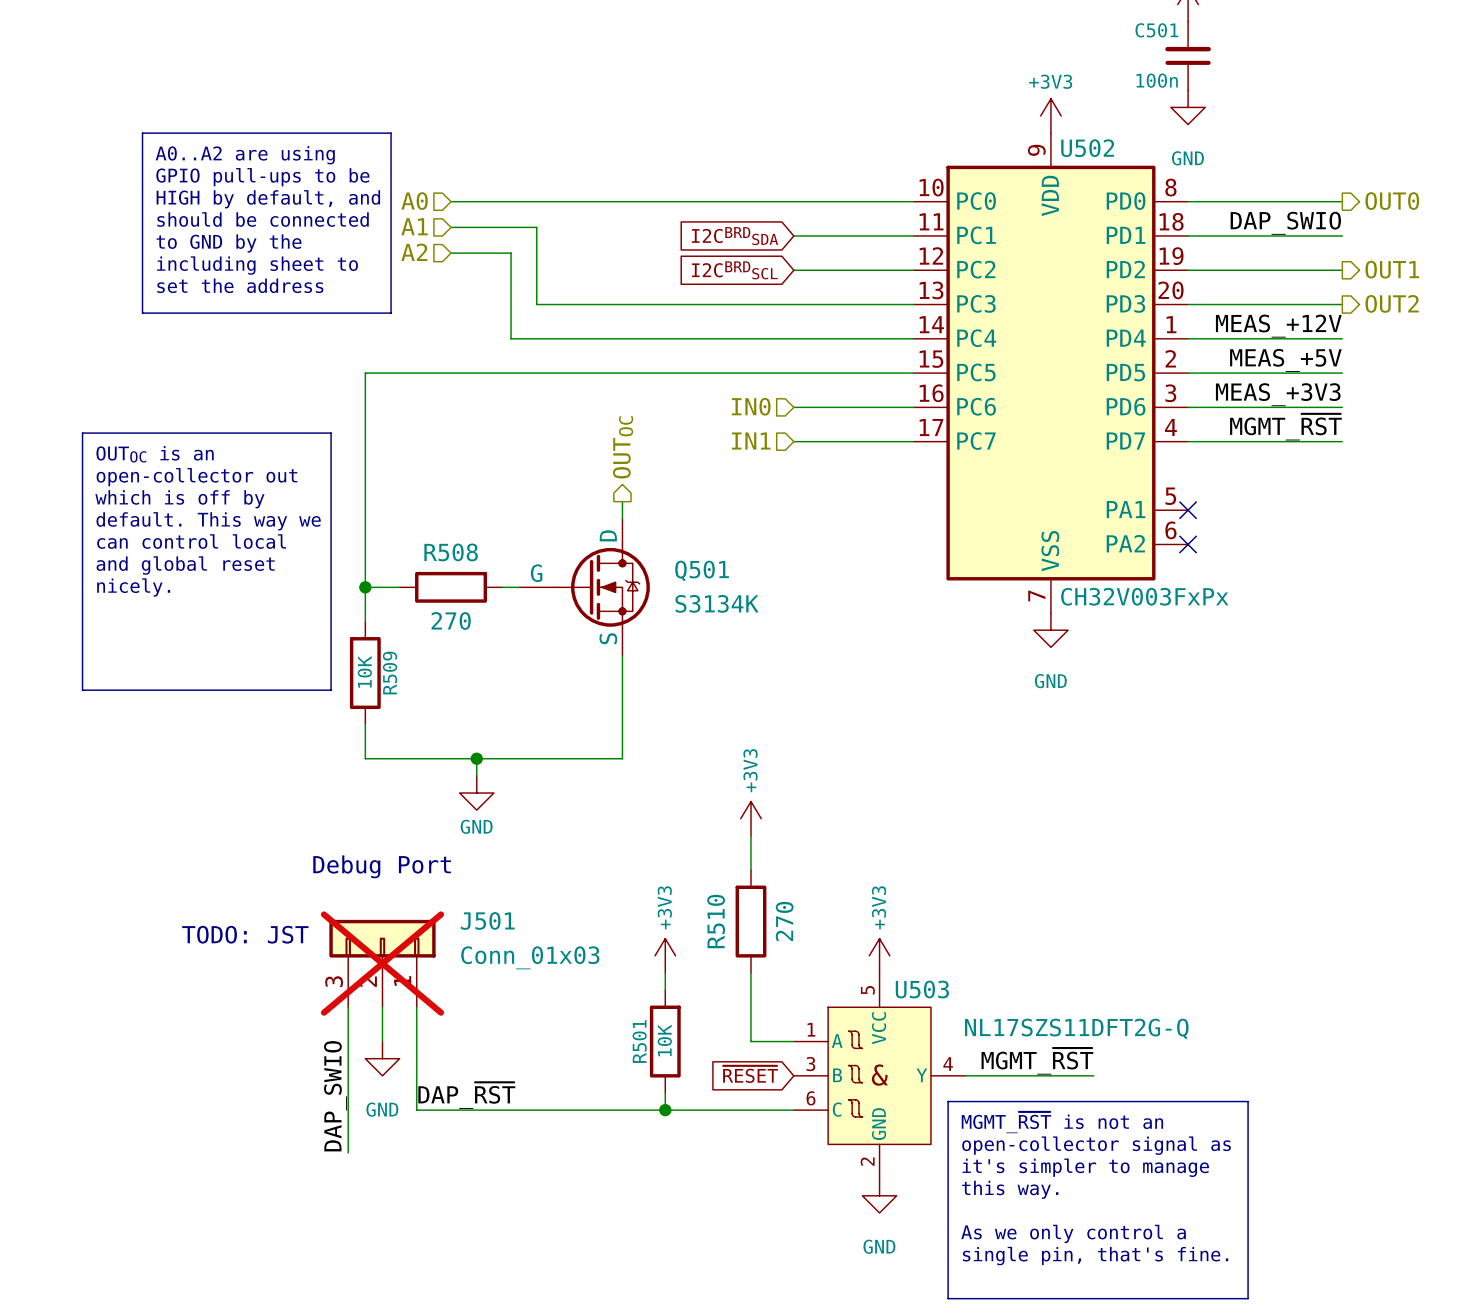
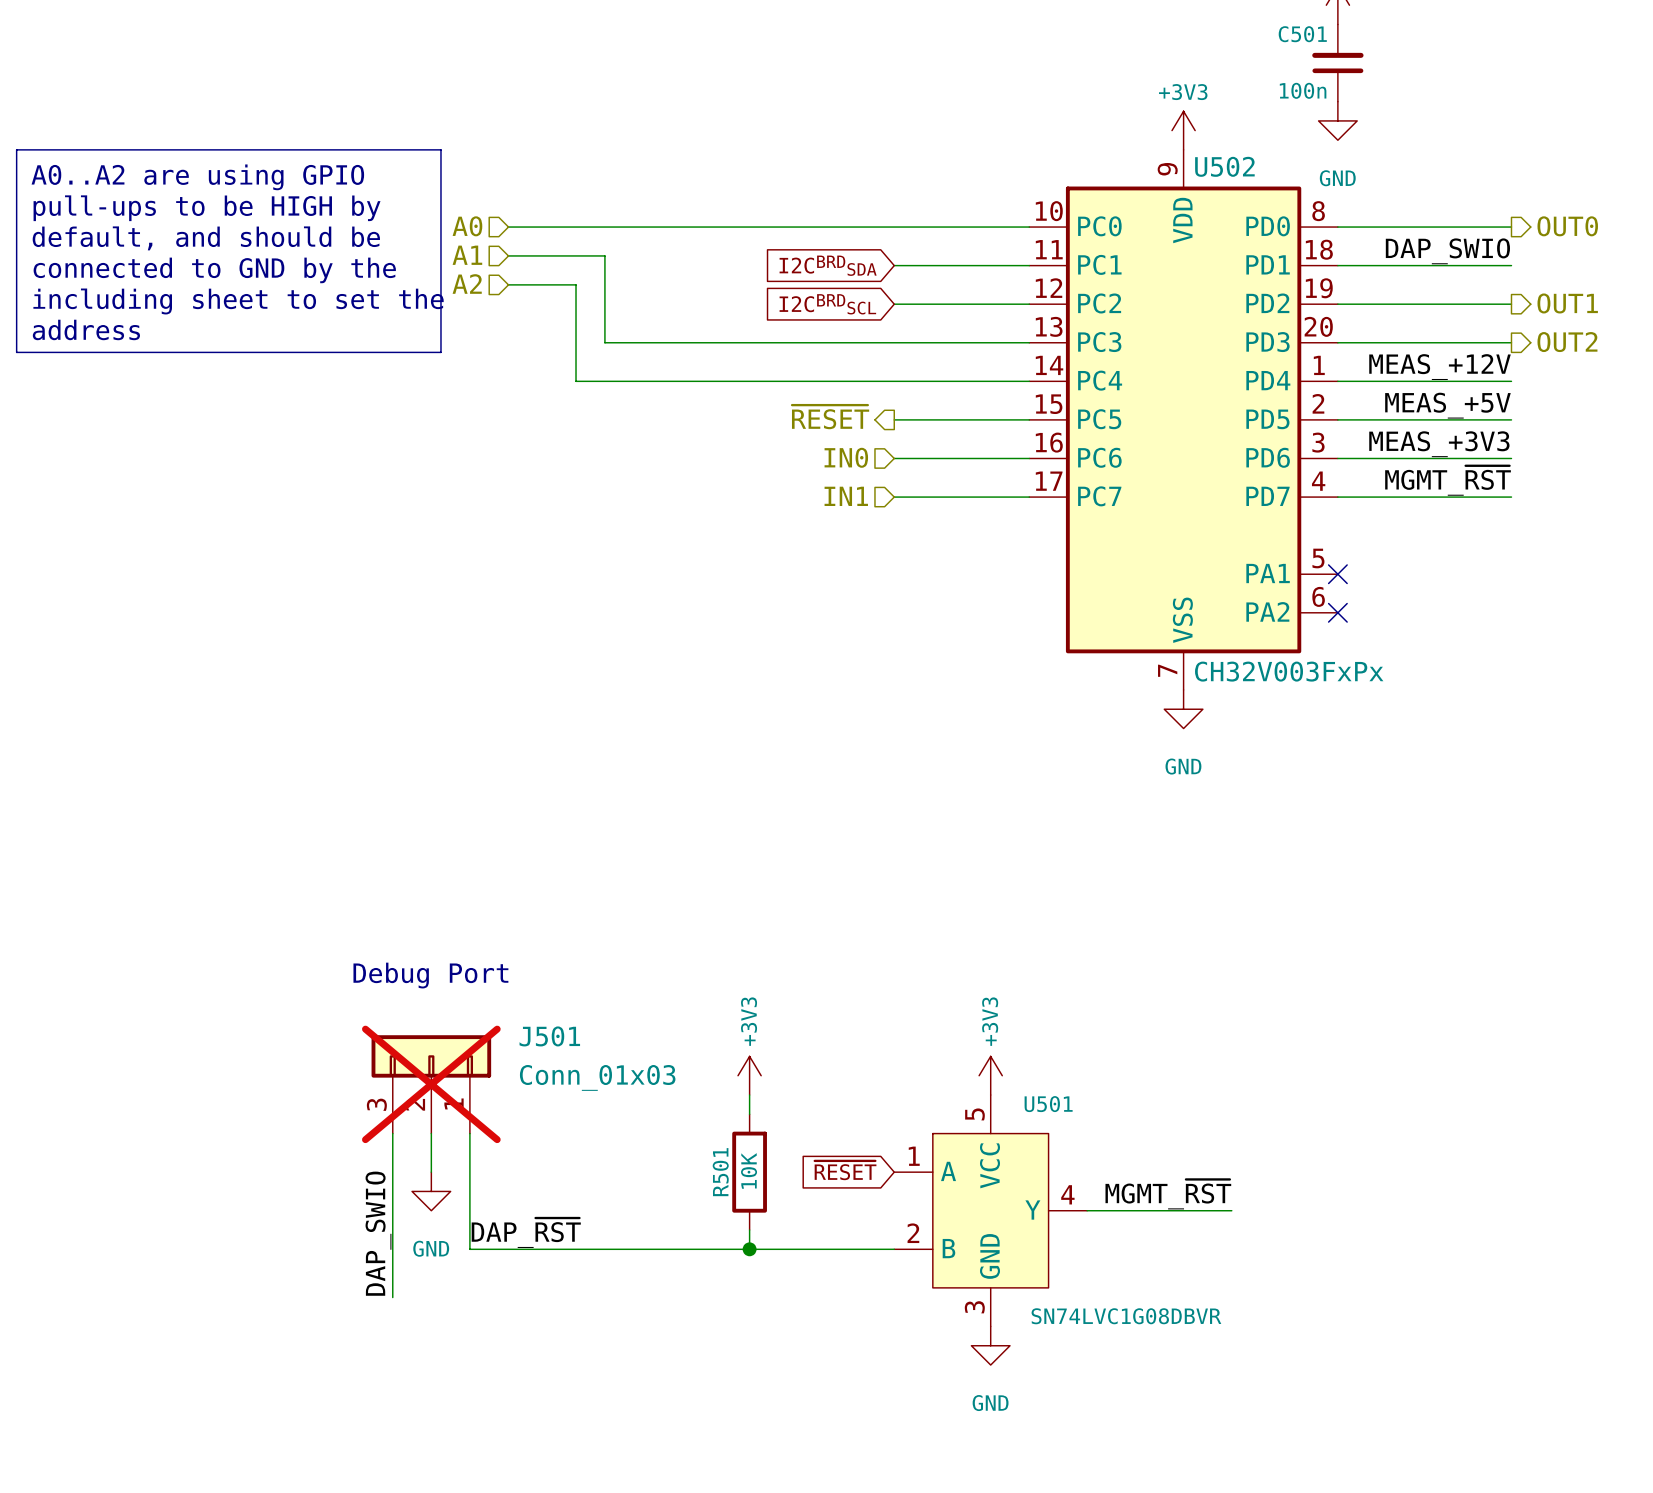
line: (142, 133) (142, 313) -> (161, 149) (16, 149) (16, 352) (161, 352)
text: A0..A2 are using (245, 155) -> A0..A2 are using GPIO (197, 177)
text: GPIO pull-ups to be (262, 177) -> pull-ups to be HIGH by (207, 208)
text: HIGH by default, and (268, 199) -> none
text: none -> default, and should be (206, 238)
text: should be connected (263, 219) -> none
text: to GND by the (229, 243) -> connected to GND by the (214, 270)
text: including sheet to (257, 265) -> including sheet to set the (238, 301)
text: set the address (240, 285) -> none
text: none -> address (86, 329)
hierarchical label: none -> ~{RESET} (830, 417)
wire: (793, 373) (365, 373) (365, 621) -> none
line: (82, 433) (331, 433) (331, 690) (82, 690) (82, 433) -> none
hierarchical label: OUTOC (623, 447) -> none
text: OUTOC is an (155, 454) -> none
text: open-collector out (197, 477) -> none
text: which is off by (179, 499) -> none
wire: (622, 501) (622, 518) -> none
text: default. This way we (208, 521) -> none
text: can control local (191, 541) -> none
text: and global reset (185, 565) -> none
text: nicely. (133, 587) -> none
wire: (365, 587) (399, 587) -> none
junction: (365, 587) -> none
R508: 270 (451, 587) -> none
wire: (502, 587) (519, 587) -> none
Q501: S3134K (584, 587) -> none
wire: (622, 655) (622, 758) (365, 758) (365, 724) -> none
R509: 10K (365, 673) -> none
wire: (476, 758) (476, 775) -> none
junction: (476, 758) -> none
power symbol: GND (476, 793) -> none
power symbol: +3V3 (750, 818) -> none
wire: (750, 835) (750, 870) -> none
R510: 270 (750, 921) -> none
text: TODO: JST (245, 934) -> none
wire: (750, 972) (750, 1041) (793, 1041) -> none
global label position: ~{RESET} (750, 1074) -> ~{RESET} (845, 1170)
U503: NL17SZS11DFT2G-Q (879, 1075) -> none
U501: none -> SN74LVC1G08DBVR (990, 1210)
line: (948, 1101) (1248, 1101) (1248, 1298) (948, 1298) (948, 1101) -> none
text: MGMT_~{RST} is not an (1062, 1122) -> none
text: open-collector signal as (1096, 1145) -> none
text: it's simpler to manage (1085, 1167) -> none
text: this way. (1010, 1189) -> none
text: As we only control a (1073, 1233) -> none
text: single pin, that's fine. (1095, 1256) -> none

